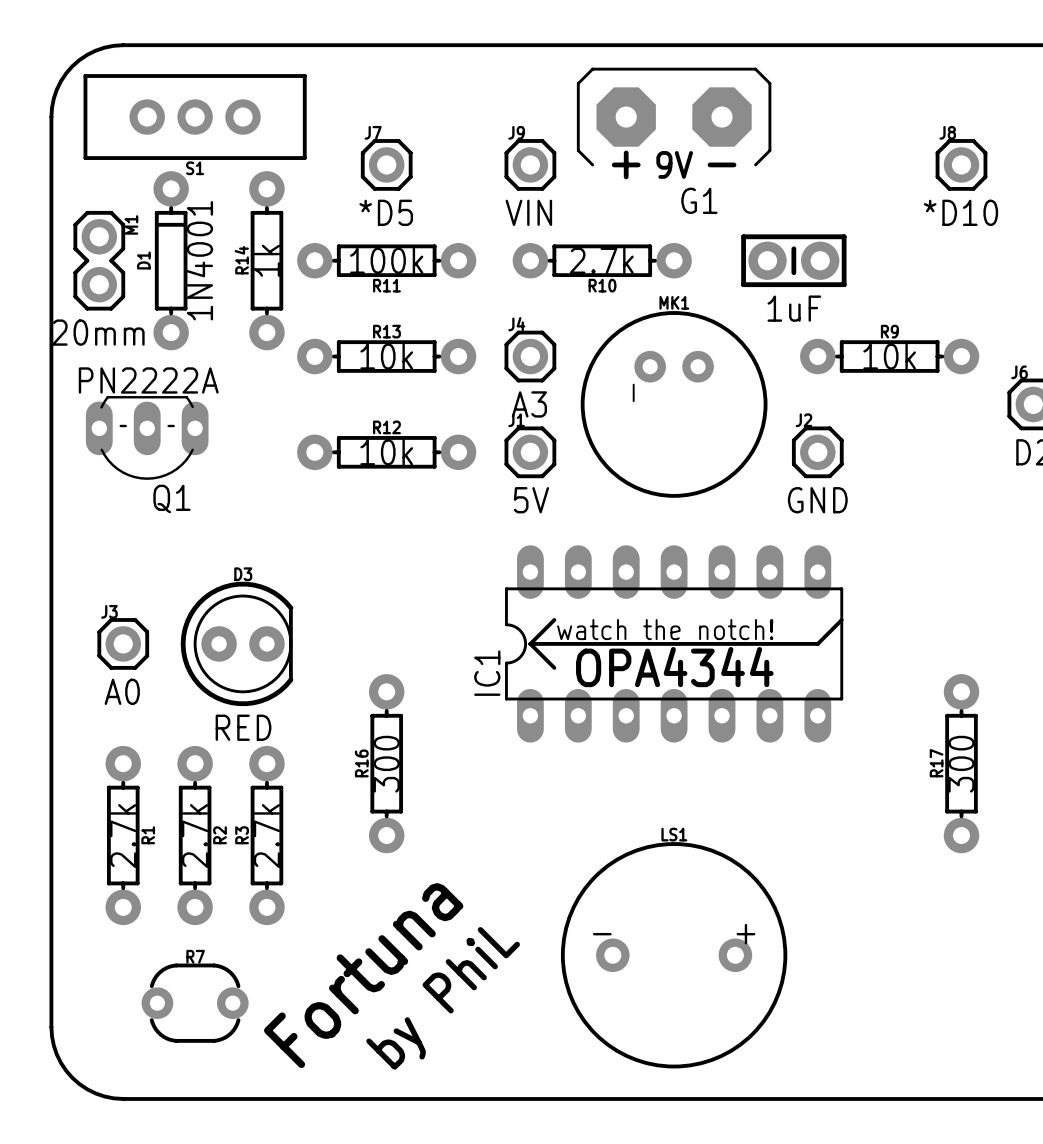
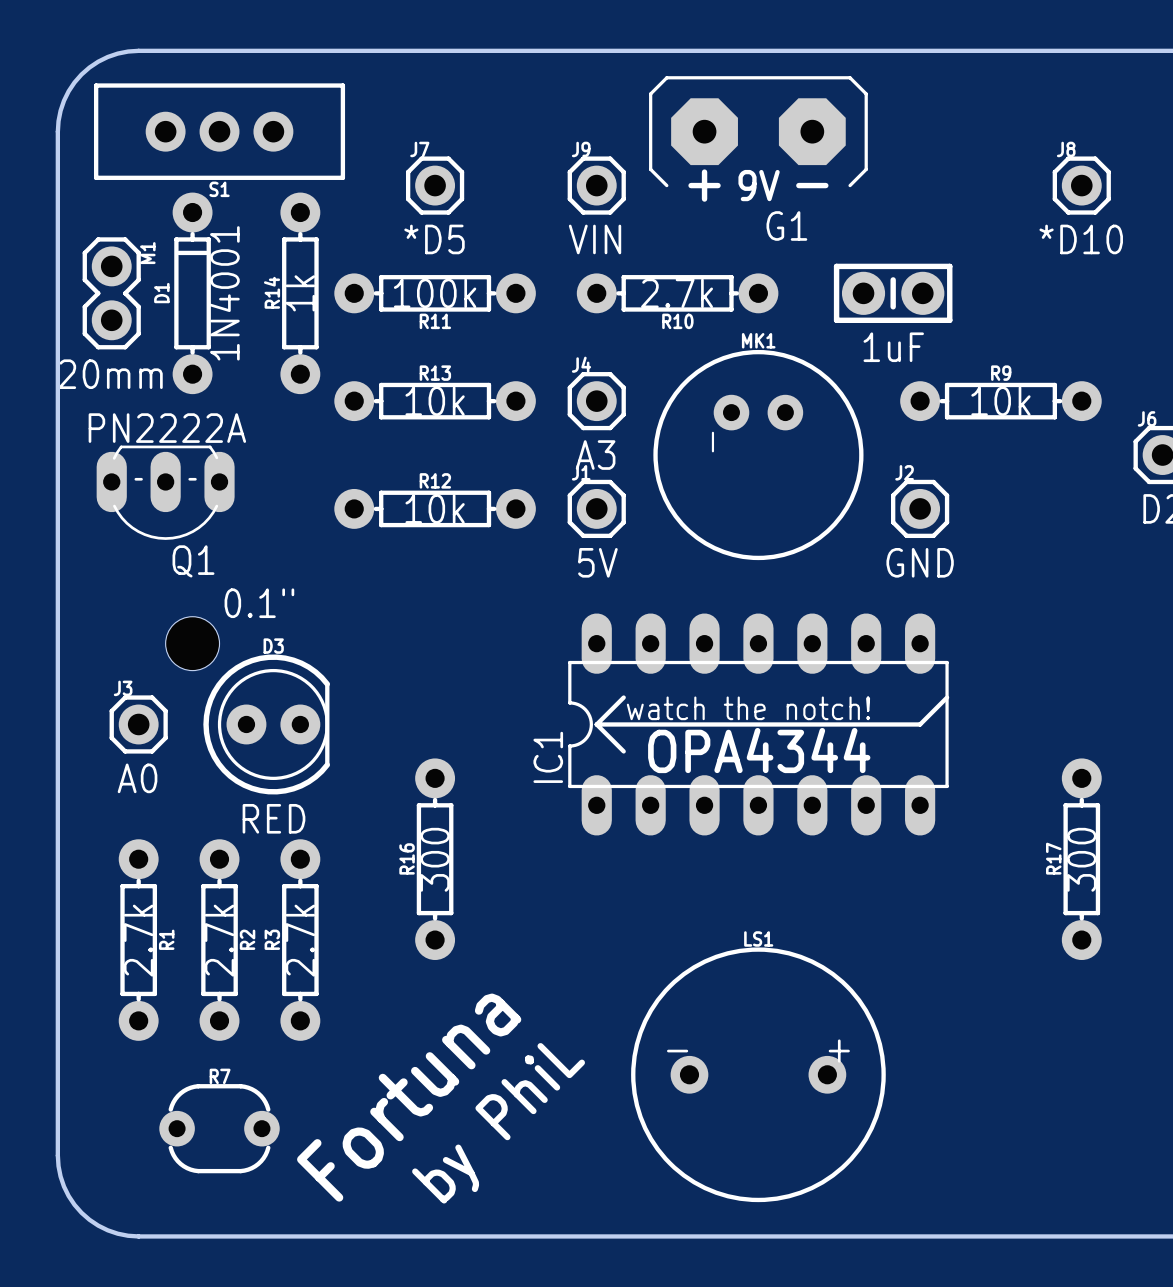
text: none -> 0.1" (259, 603)
hole: none -> (192, 643)

